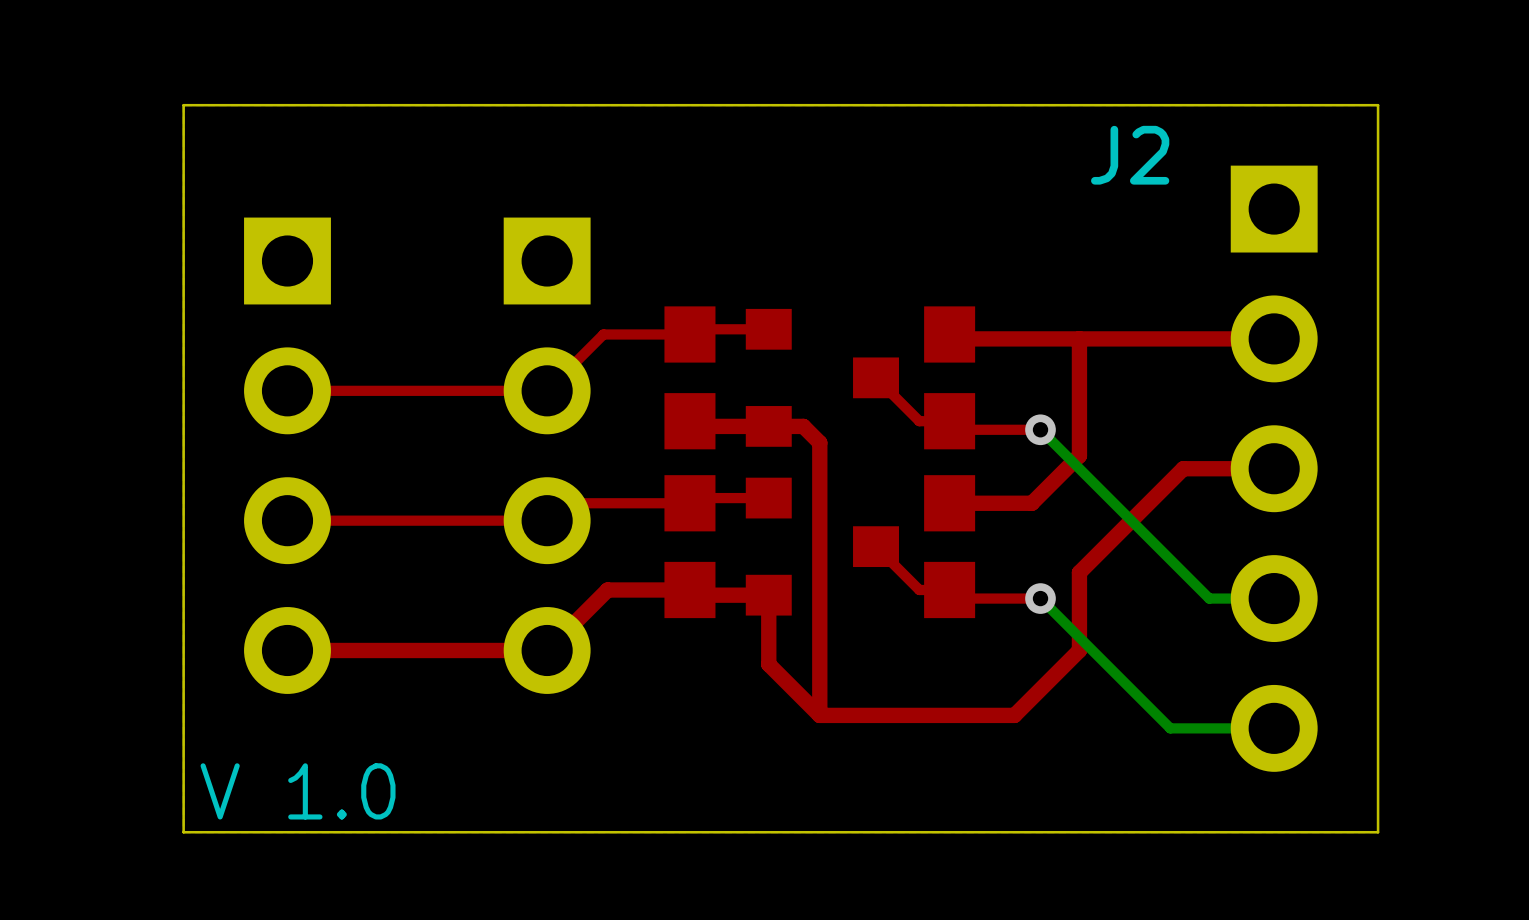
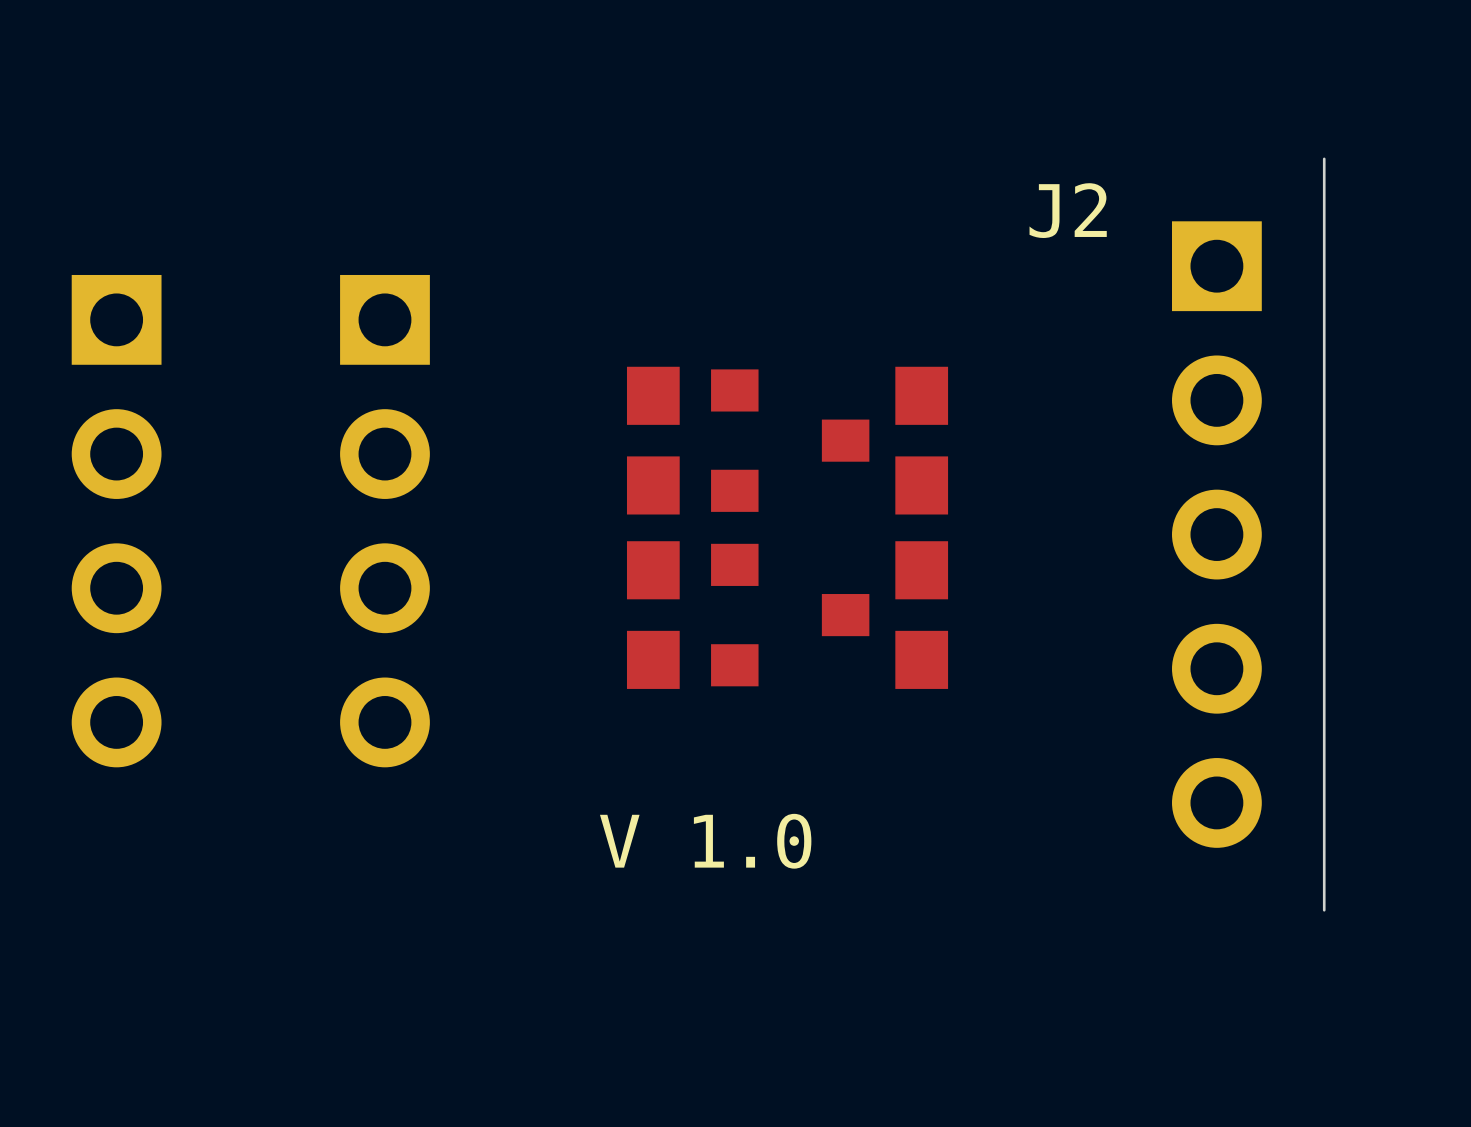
board edge: none -> (1324, 158) (1324, 910)
board edge: (1378, 105) (183, 105) (183, 832) (1378, 832) (1378, 105) -> none
top track: (768, 329) (695, 329) (689, 334) (603, 334) (547, 390) (287, 390) -> none
top track: (949, 334) (954, 338) (1274, 338) -> none
top track: (1079, 338) (1079, 455) (1031, 503) (949, 503) -> none
top track: (876, 377) (919, 421) (949, 421) (958, 429) (1040, 429) -> none
top track: (689, 421) (695, 426) (803, 426) (819, 442) (819, 715) -> none
bottom track: (1040, 429) (1209, 598) (1274, 598) -> none
via: (1040, 429) -> none
part: none -> (116, 521)
part: (287, 455) -> none
part: none -> (384, 521)
part: (547, 455) -> none
top track: (1274, 468) (1183, 468) (1079, 572) (1079, 650) (1014, 715) (819, 715) -> none
J2 position: (1274, 468) -> (1216, 534)
top track: (768, 498) (695, 498) (689, 503) (564, 503) (547, 520) (287, 520) -> none
top track: (876, 546) (919, 589) (949, 589) (958, 598) (1040, 598) -> none
bottom track: (1040, 598) (1170, 728) (1274, 728) -> none
via: (1040, 598) -> none
top track: (287, 650) (547, 650) (607, 589) (689, 589) (695, 595) (768, 595) (768, 664) (819, 715) -> none
text position: V 1.0 (298, 791) -> V 1.0 (705, 841)

